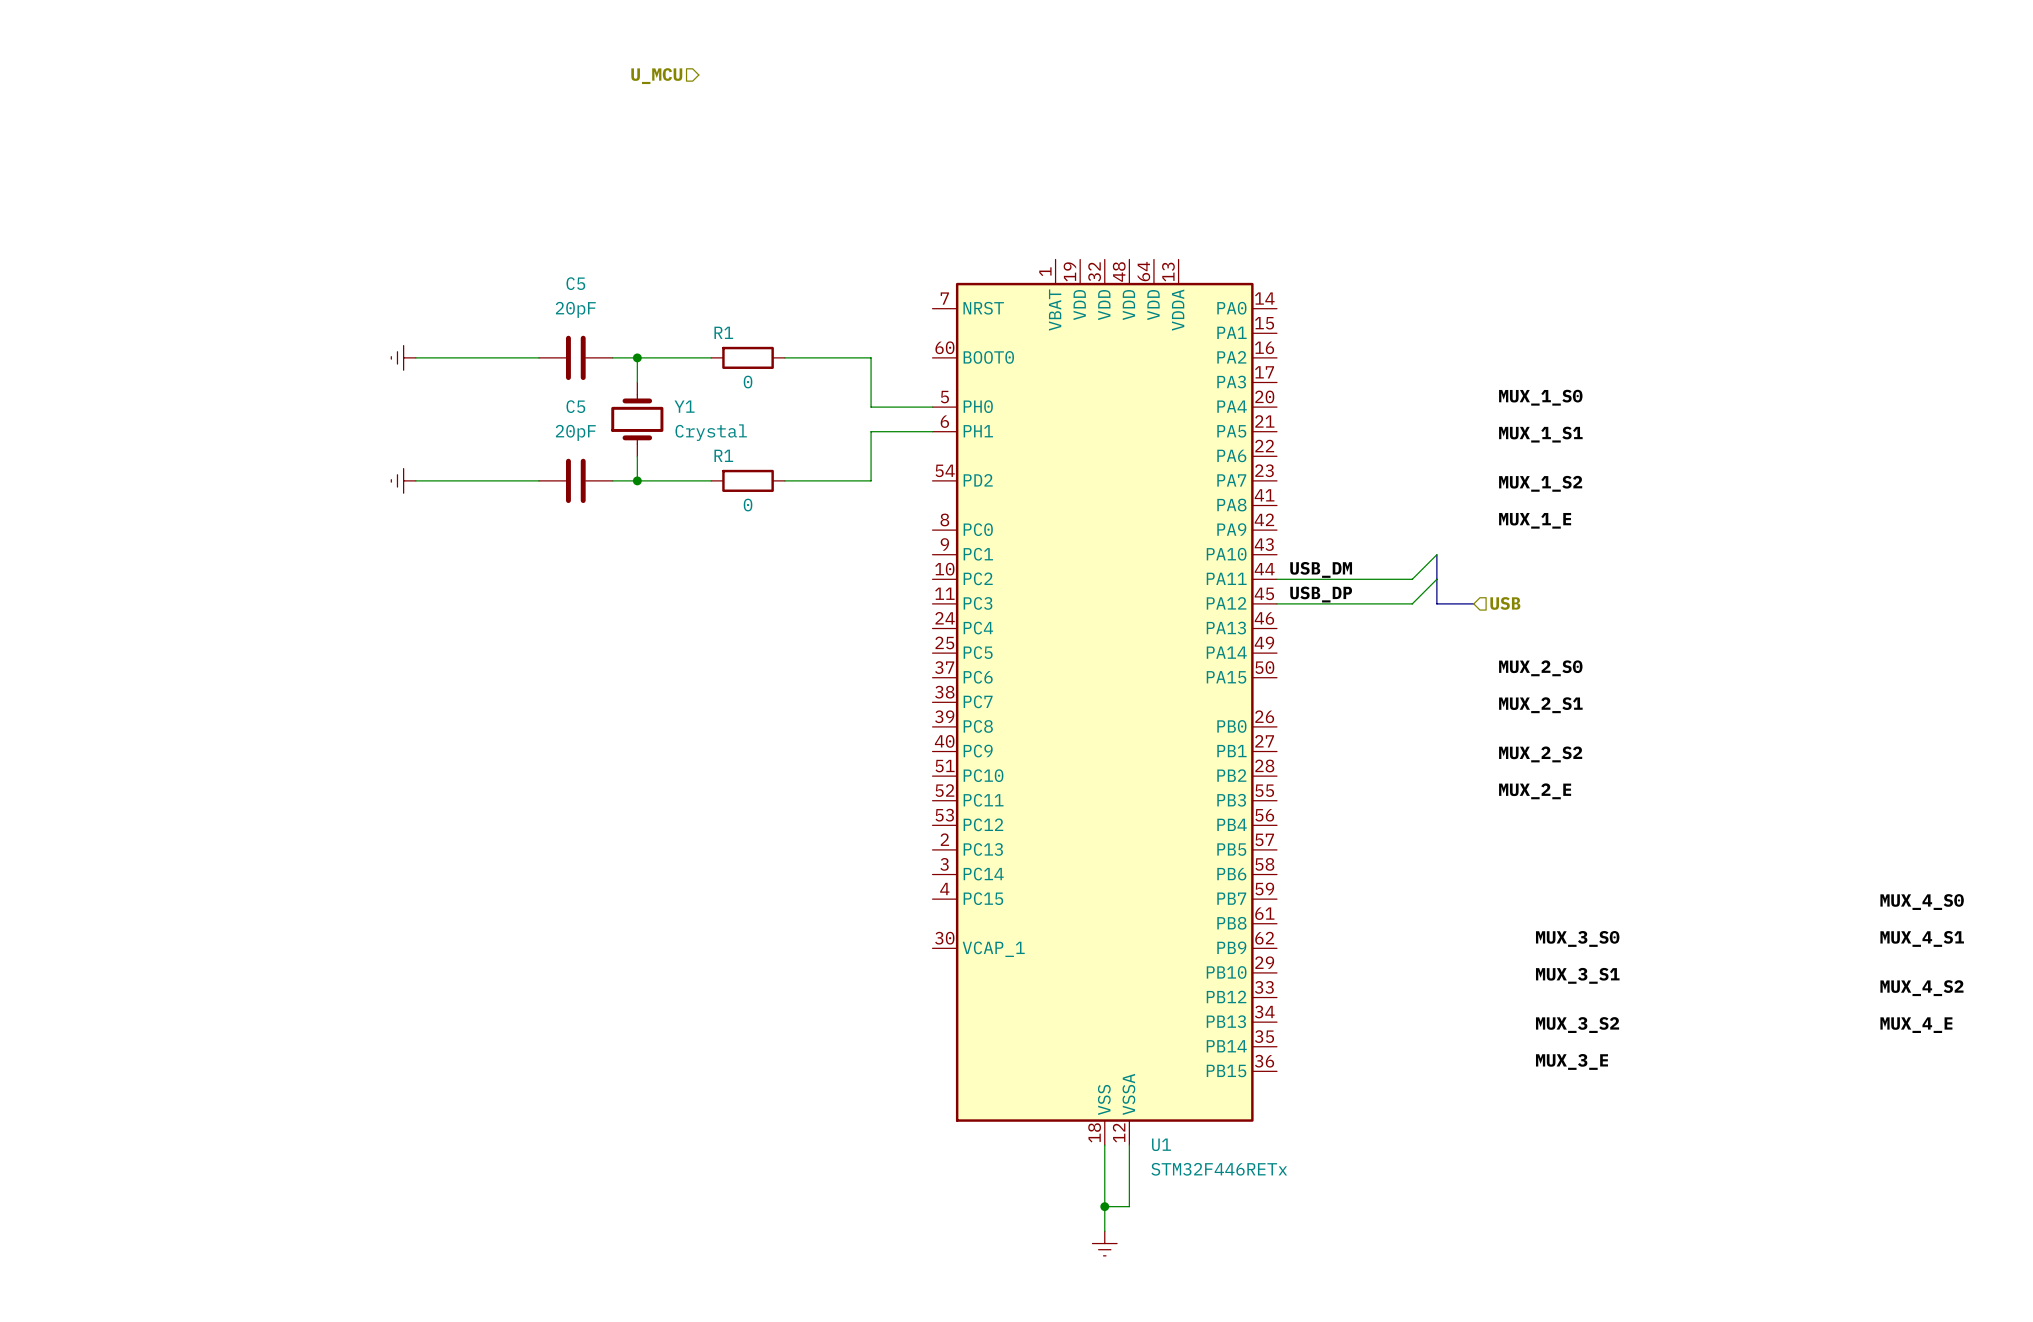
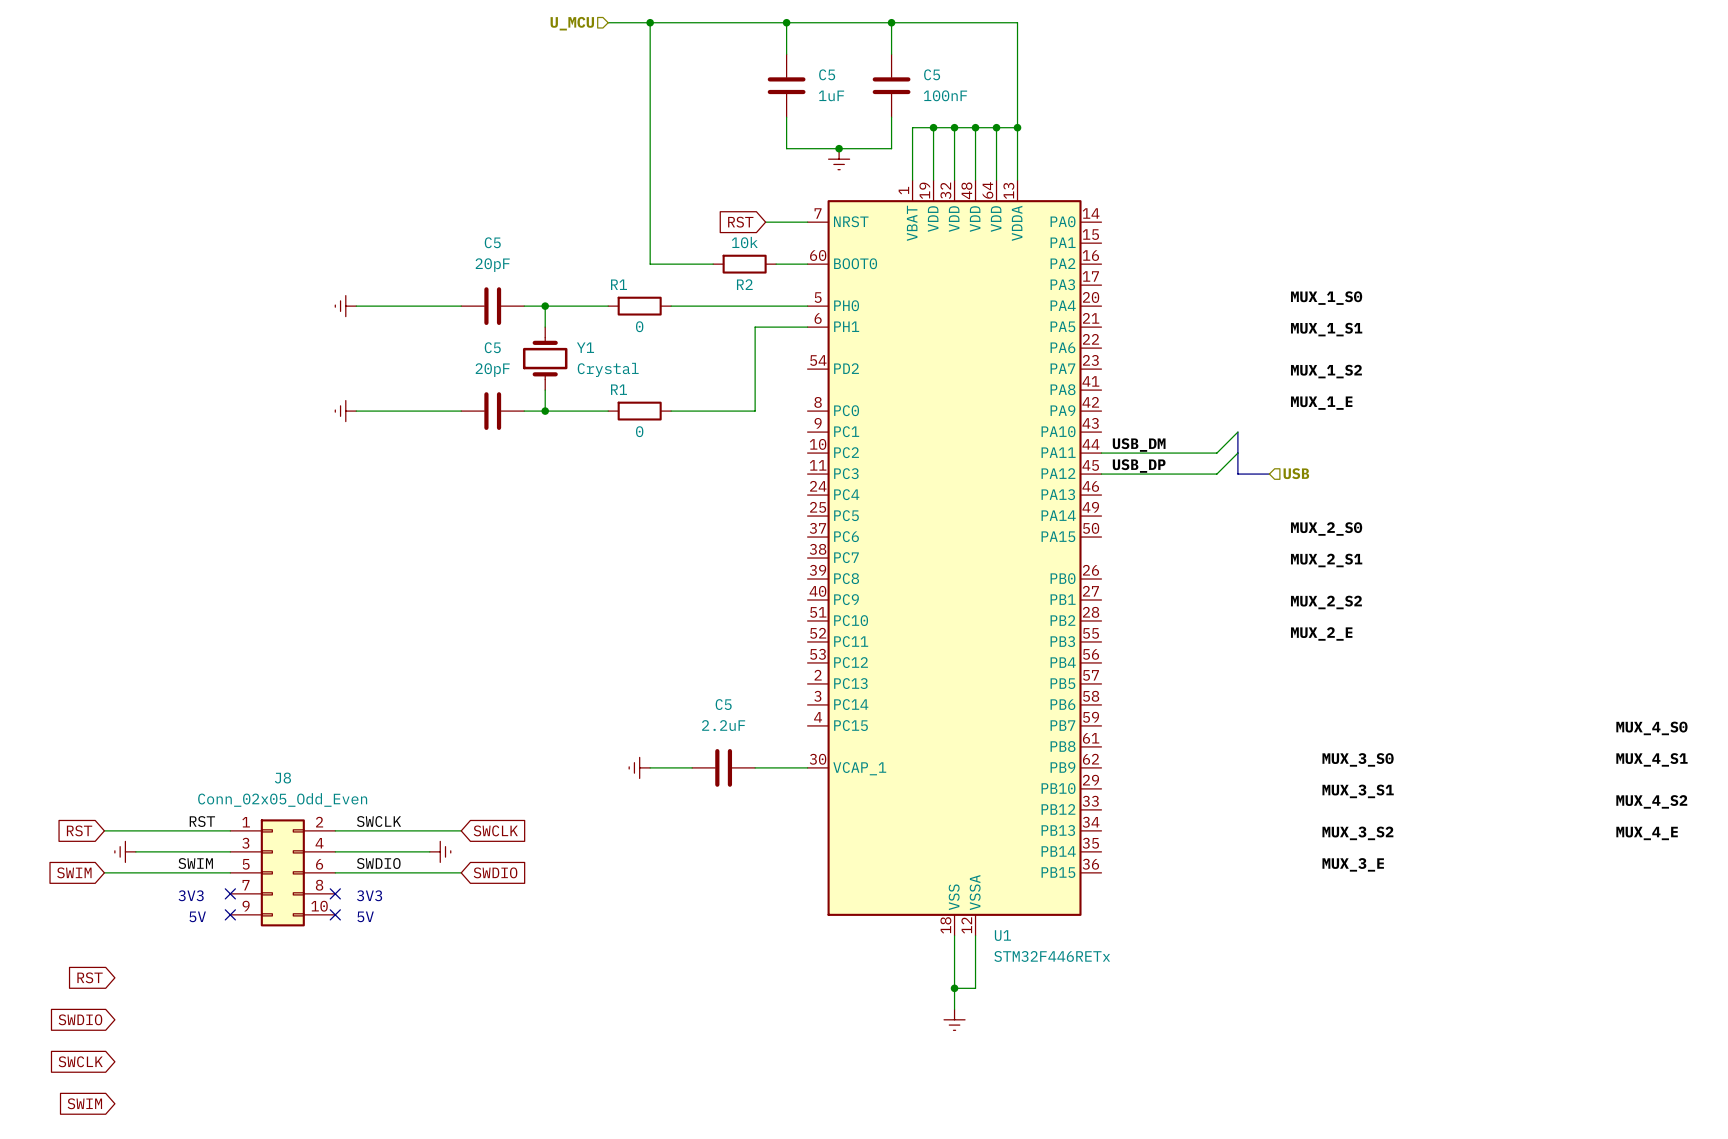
wire: none -> (608, 22) (1017, 22) (1017, 180)
wire: none -> (650, 22) (650, 264) (713, 264)
junction: none -> (650, 22)
wire: none -> (786, 22) (786, 54)
junction: none -> (786, 22)
wire: none -> (891, 22) (891, 54)
junction: none -> (891, 22)
hierarchical label position: U_MCU (656, 76) -> U_MCU (572, 23)
C5: none -> 1uF (786, 85)
C5: none -> 100nF (891, 85)
wire: none -> (786, 117) (786, 148) (891, 148) (891, 117)
wire: none -> (933, 127) (933, 180)
junction: none -> (933, 127)
wire: none -> (954, 127) (954, 180)
junction: none -> (954, 127)
wire: none -> (975, 127) (975, 180)
junction: none -> (975, 127)
wire: none -> (996, 127) (996, 180)
junction: none -> (996, 127)
wire: none -> (1017, 127) (912, 127) (912, 180)
junction: none -> (1017, 127)
junction: none -> (839, 148)
power symbol: none -> (839, 159)
global label: none -> RST (740, 222)
wire: none -> (765, 222) (807, 222)
R2: none -> 10k (744, 264)
wire: none -> (776, 264) (807, 264)
wire: (871, 357) (871, 407) (932, 407) -> (744, 306) (807, 306)
label position: MUX_1_S0 (1540, 397) -> MUX_1_S0 (1326, 298)
wire: (932, 431) (871, 431) (871, 480) -> (807, 327) (755, 327) (755, 411) (744, 411)
label position: MUX_1_S1 (1540, 434) -> MUX_1_S1 (1326, 329)
label position: MUX_1_S2 (1540, 483) -> MUX_1_S2 (1326, 371)
label position: MUX_1_E (1535, 520) -> MUX_1_E (1321, 403)
wire: (1436, 554) (1412, 579) (1276, 579) -> (1237, 432) (1216, 453) (1101, 453)
bus: (1436, 554) (1436, 603) (1473, 603) -> (1237, 432) (1237, 474) (1269, 474)
label position: USB_DM (1321, 569) -> USB_DM (1139, 445)
wire: (1436, 579) (1412, 603) (1276, 603) -> (1237, 453) (1216, 474) (1101, 474)
label position: USB_DP (1321, 594) -> USB_DP (1139, 466)
hierarchical label position: USB (1505, 603) -> USB (1296, 473)
label position: MUX_2_S0 (1540, 668) -> MUX_2_S0 (1326, 529)
U1 position: (1104, 702) -> (954, 558)
label position: MUX_2_S1 (1540, 705) -> MUX_2_S1 (1326, 560)
label position: MUX_2_S2 (1540, 754) -> MUX_2_S2 (1326, 602)
label position: MUX_2_E (1535, 791) -> MUX_2_E (1321, 633)
power symbol: none -> (639, 767)
wire: none -> (650, 767) (692, 767)
C5: none -> 2.2uF (723, 767)
wire: none -> (755, 767) (807, 767)
label position: MUX_4_S0 (1922, 902) -> MUX_4_S0 (1651, 728)
label position: MUX_3_S0 (1577, 938) -> MUX_3_S0 (1358, 759)
label position: MUX_4_S1 (1922, 938) -> MUX_4_S1 (1651, 759)
label: none -> RST (202, 821)
label: none -> SWCLK (379, 821)
global label: none -> RST (79, 830)
wire: none -> (104, 830) (230, 830)
wire: none -> (335, 830) (461, 830)
global label: none -> SWCLK (495, 830)
label position: MUX_3_S1 (1577, 975) -> MUX_3_S1 (1358, 791)
label position: MUX_4_S2 (1921, 988) -> MUX_4_S2 (1651, 801)
power symbol: none -> (125, 851)
wire: none -> (135, 851) (230, 851)
wire: none -> (335, 851) (429, 851)
power symbol: none -> (440, 851)
label: none -> SWIM (195, 863)
label: none -> SWDIO (378, 863)
global label: none -> SWIM (74, 872)
wire: none -> (104, 872) (230, 872)
J8: none -> Conn_02x05_Odd_Even (282, 872)
wire: none -> (335, 872) (461, 872)
global label: none -> SWDIO (495, 872)
label position: MUX_3_S2 (1577, 1025) -> MUX_3_S2 (1357, 833)
label position: MUX_4_E (1916, 1025) -> MUX_4_E (1647, 833)
no-connect mark: none -> (230, 893)
no-connect mark: none -> (335, 893)
text: none -> 3V3 (191, 895)
text: none -> 3V3 (369, 895)
label position: MUX_3_E (1571, 1061) -> MUX_3_E (1353, 864)
no-connect mark: none -> (230, 914)
no-connect mark: none -> (335, 914)
text: none -> 5V (197, 916)
text: none -> 5V (365, 916)
global label: none -> RST (90, 977)
wire: (1104, 1145) (1104, 1231) -> (954, 935) (954, 1009)
wire: (1129, 1145) (1129, 1206) (1104, 1206) -> (975, 935) (975, 988) (954, 988)
global label: none -> SWDIO (80, 1019)
junction position: (1104, 1206) -> (954, 988)
global label: none -> SWCLK (80, 1061)
power symbol position: (1104, 1243) -> (954, 1019)
global label: none -> SWIM (84, 1103)

